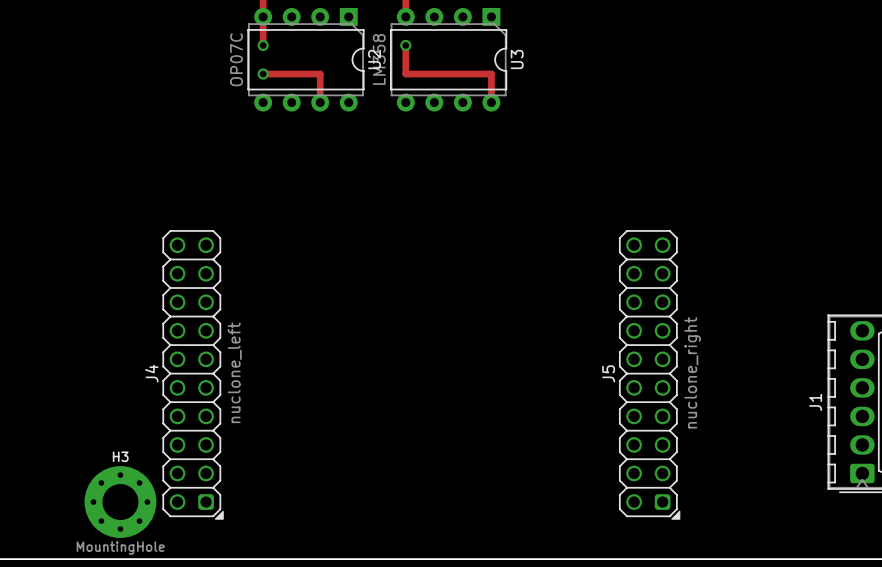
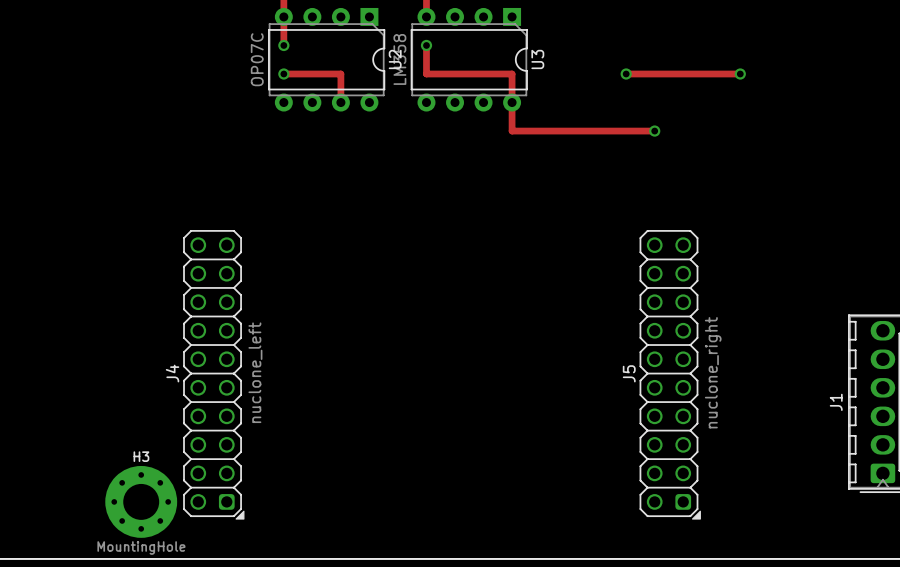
track: none -> (626, 74) (740, 74)
via: none -> (626, 74)
via: none -> (740, 74)
track: none -> (512, 102) (512, 131) (654, 131)
via: none -> (654, 131)

